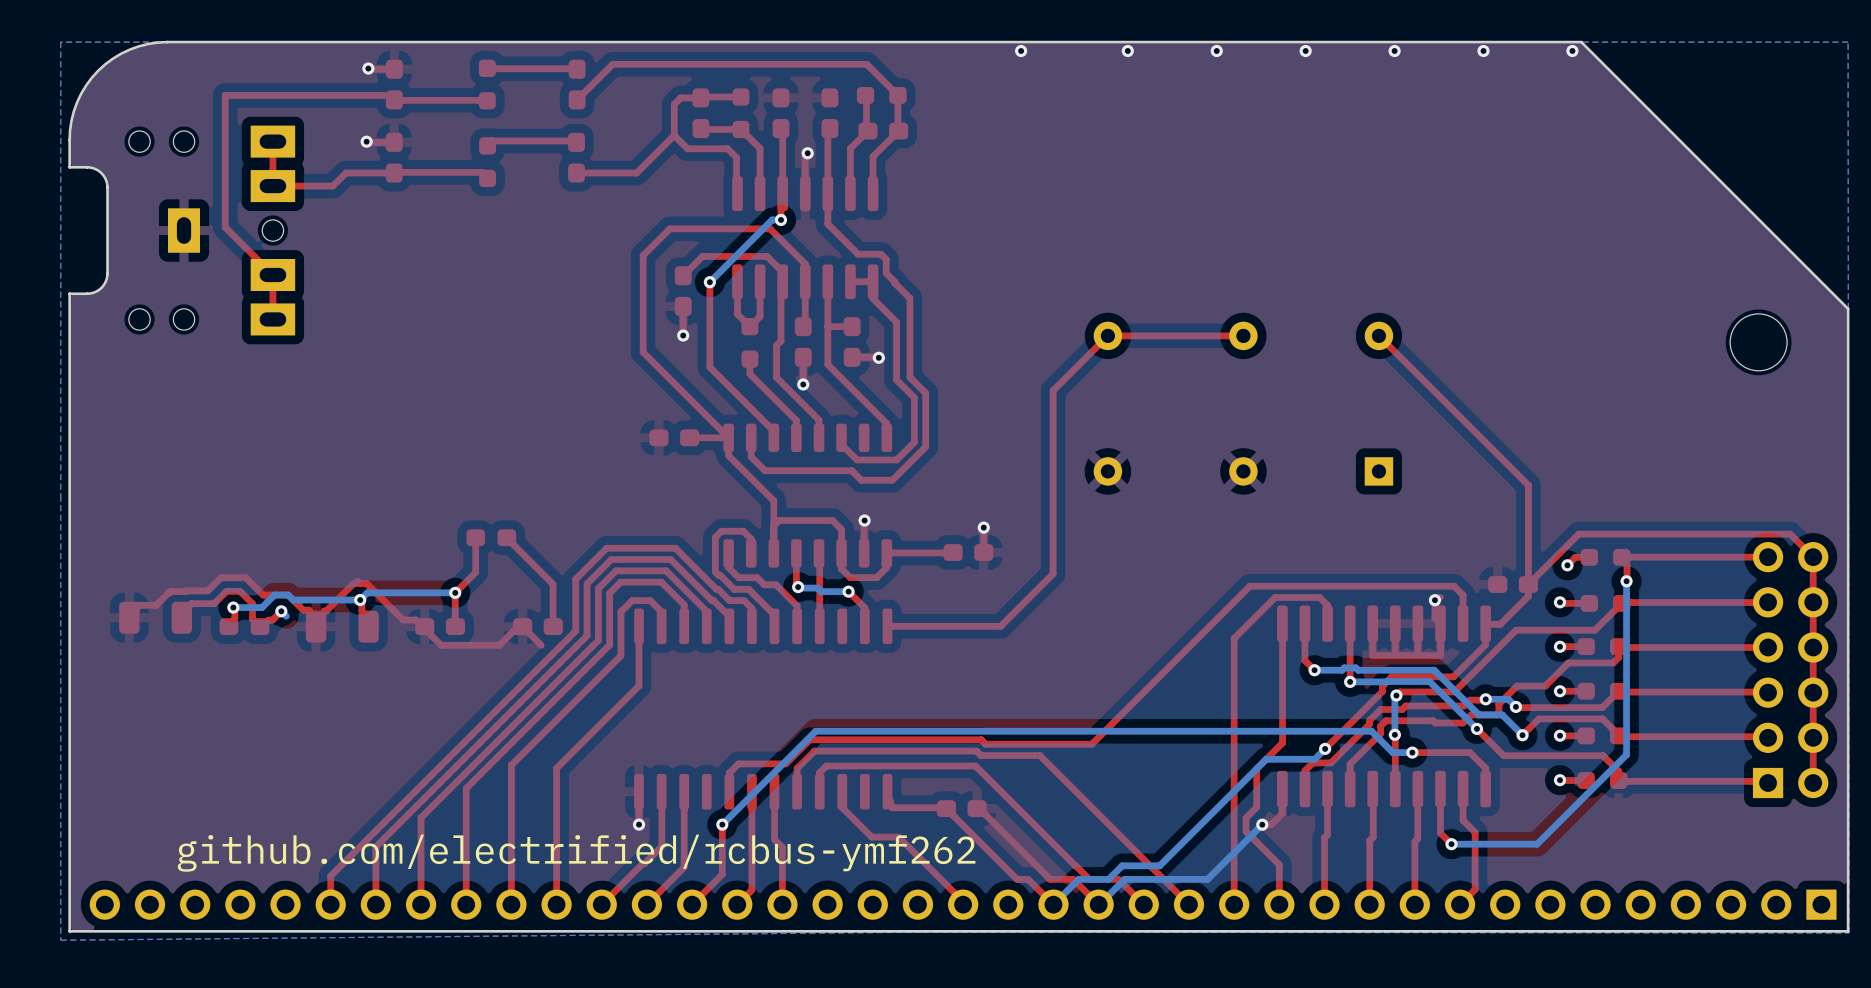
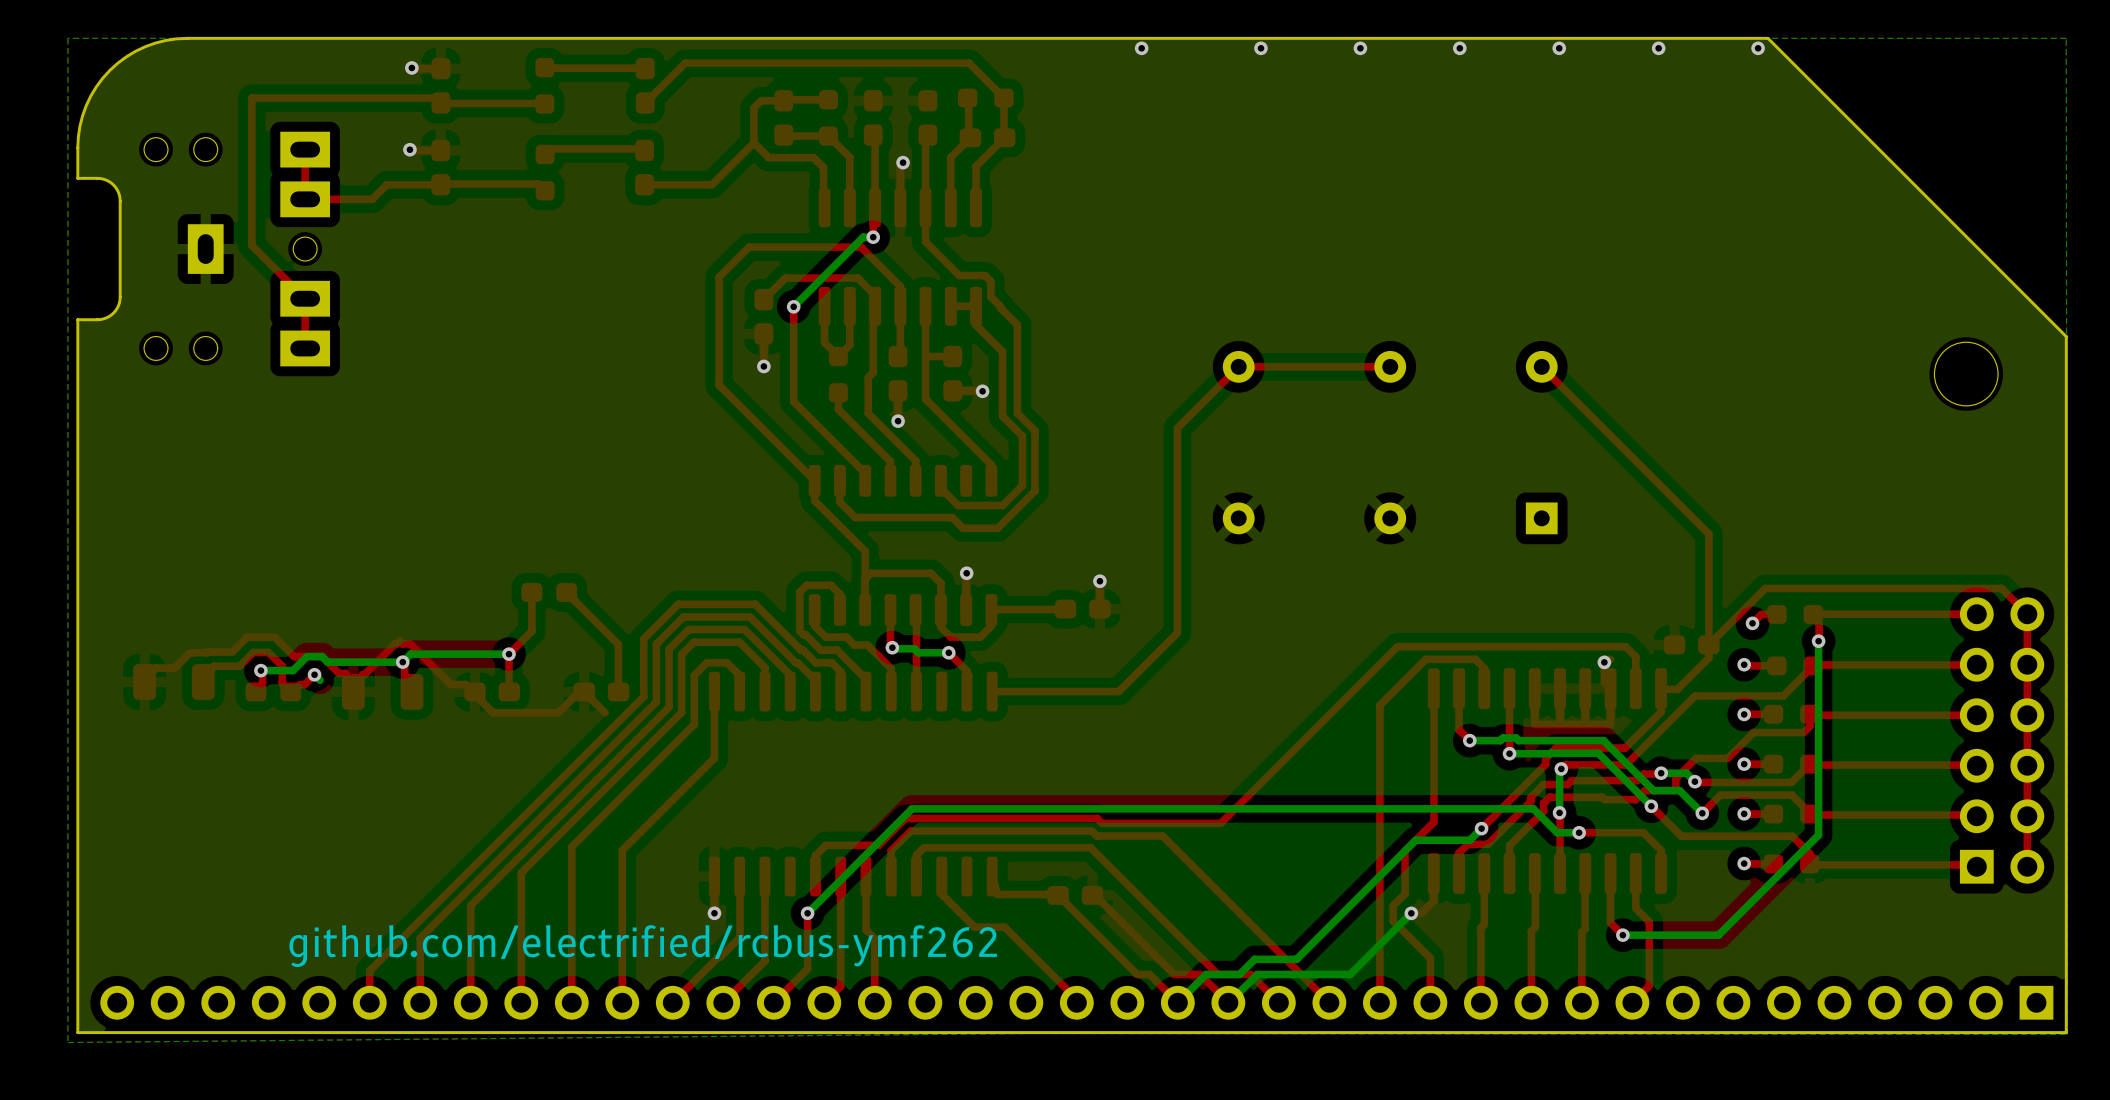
part: (674, 437) -> none
top track: (728, 437) (689, 437) -> none

